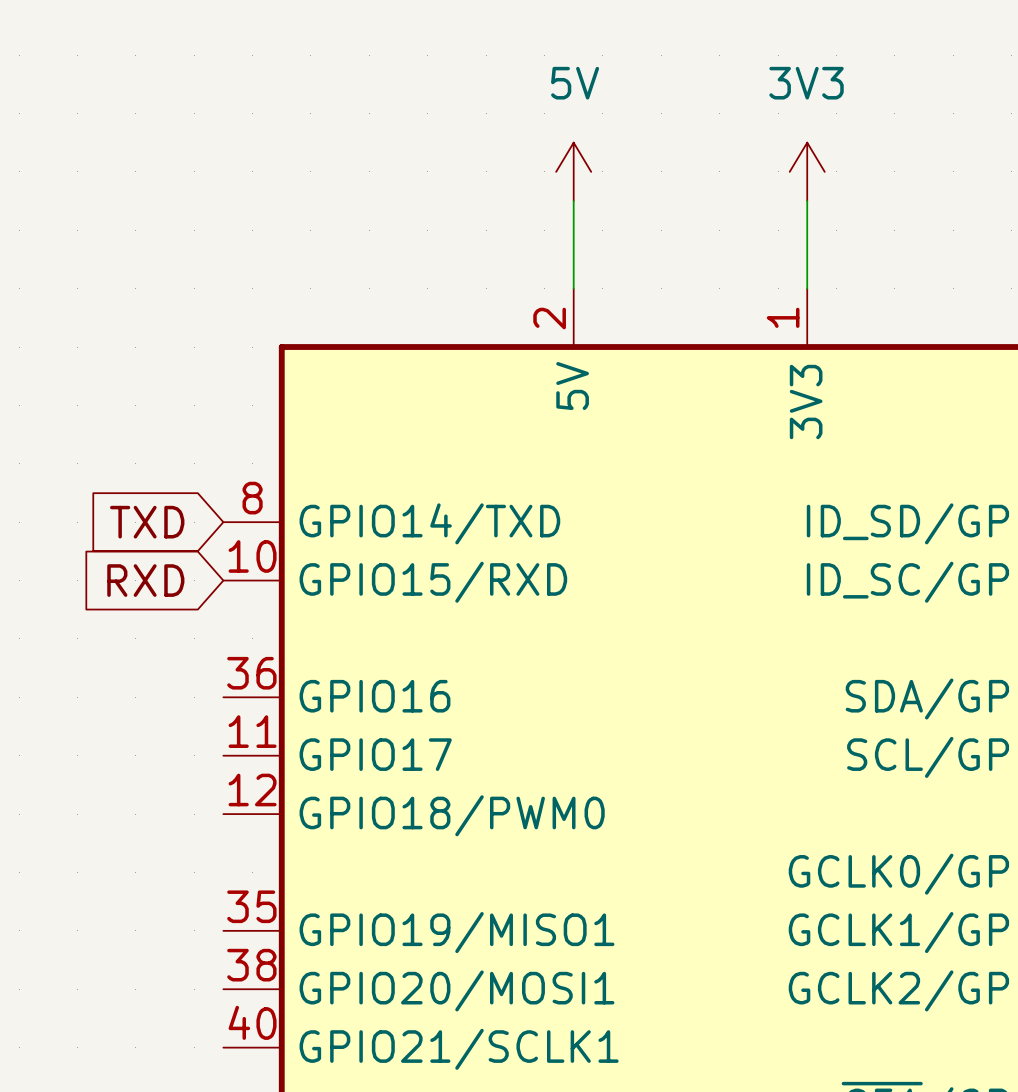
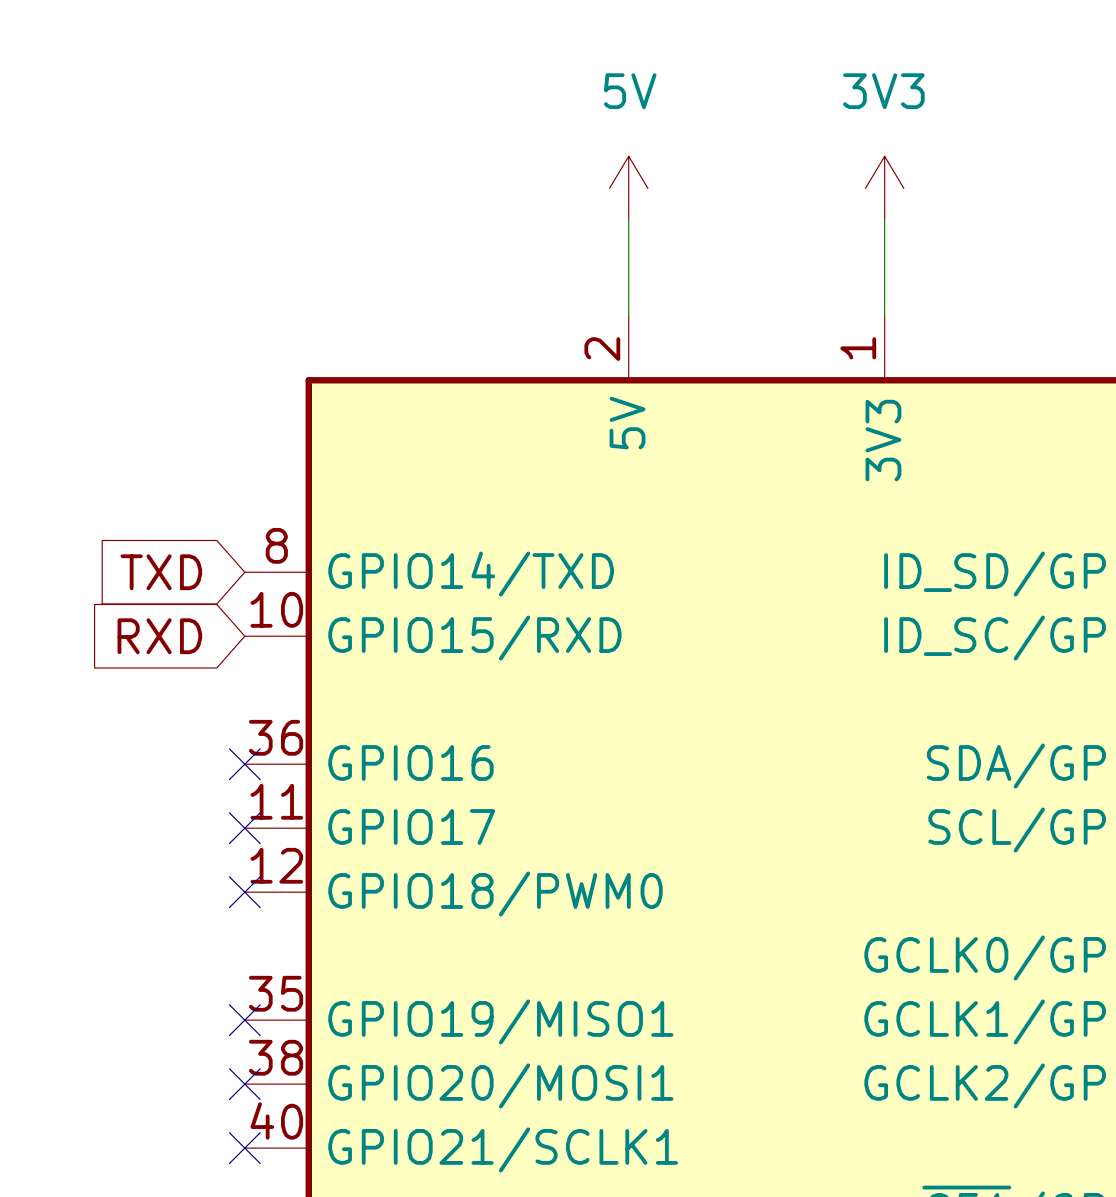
no-connect mark: none -> (244, 764)
no-connect mark: none -> (244, 828)
no-connect mark: none -> (244, 892)
no-connect mark: none -> (244, 1020)
no-connect mark: none -> (244, 1084)
no-connect mark: none -> (244, 1148)

